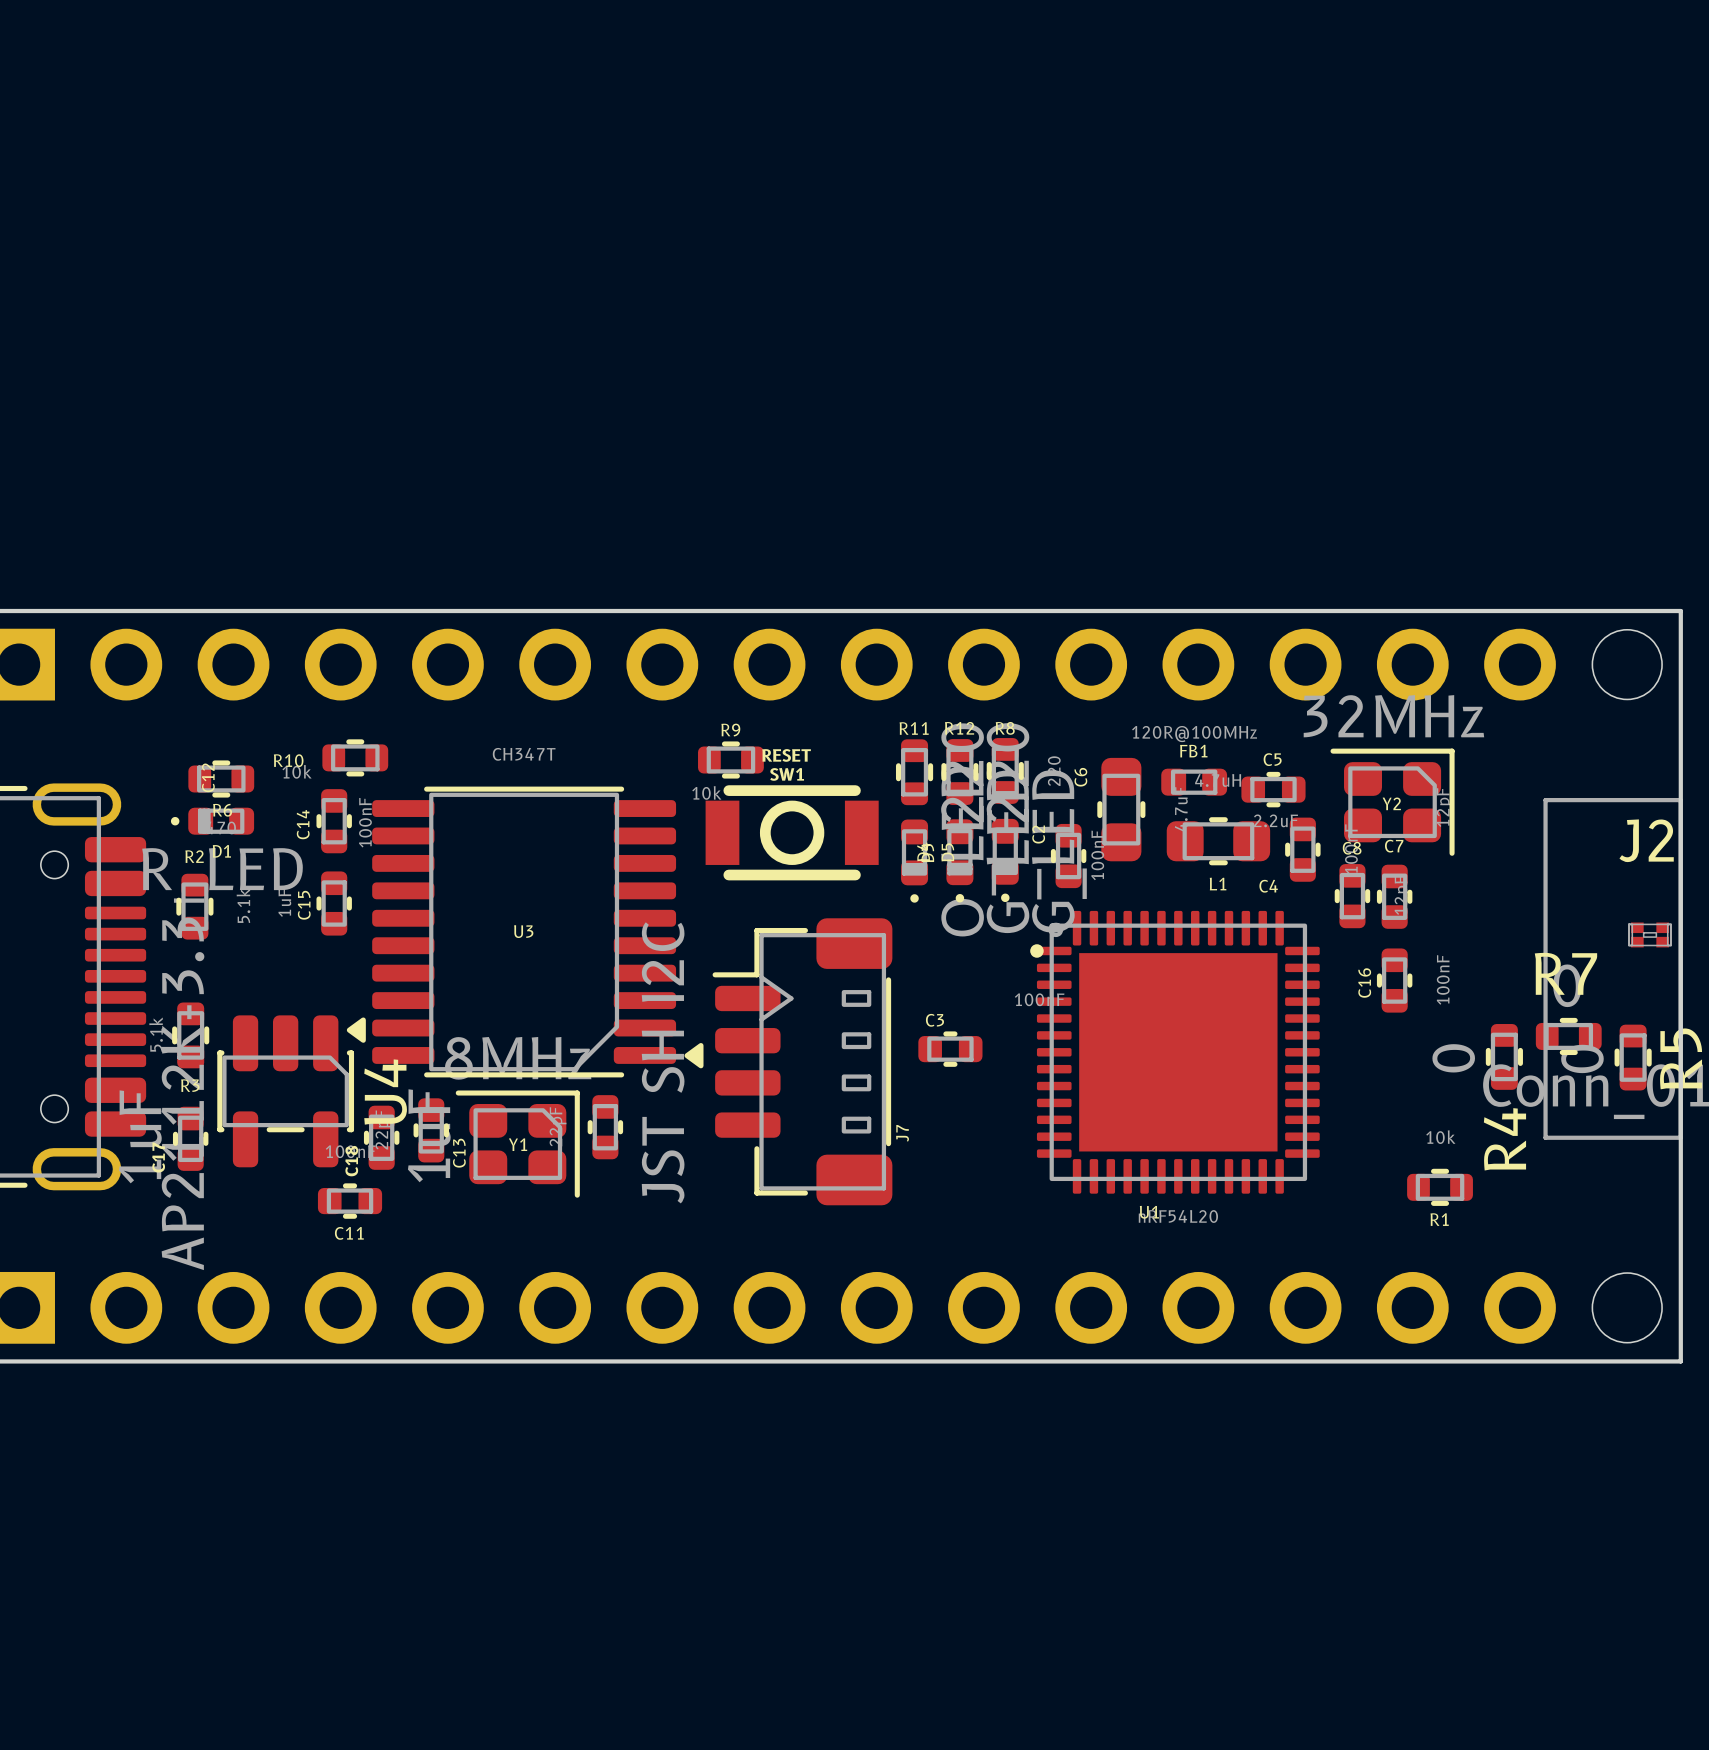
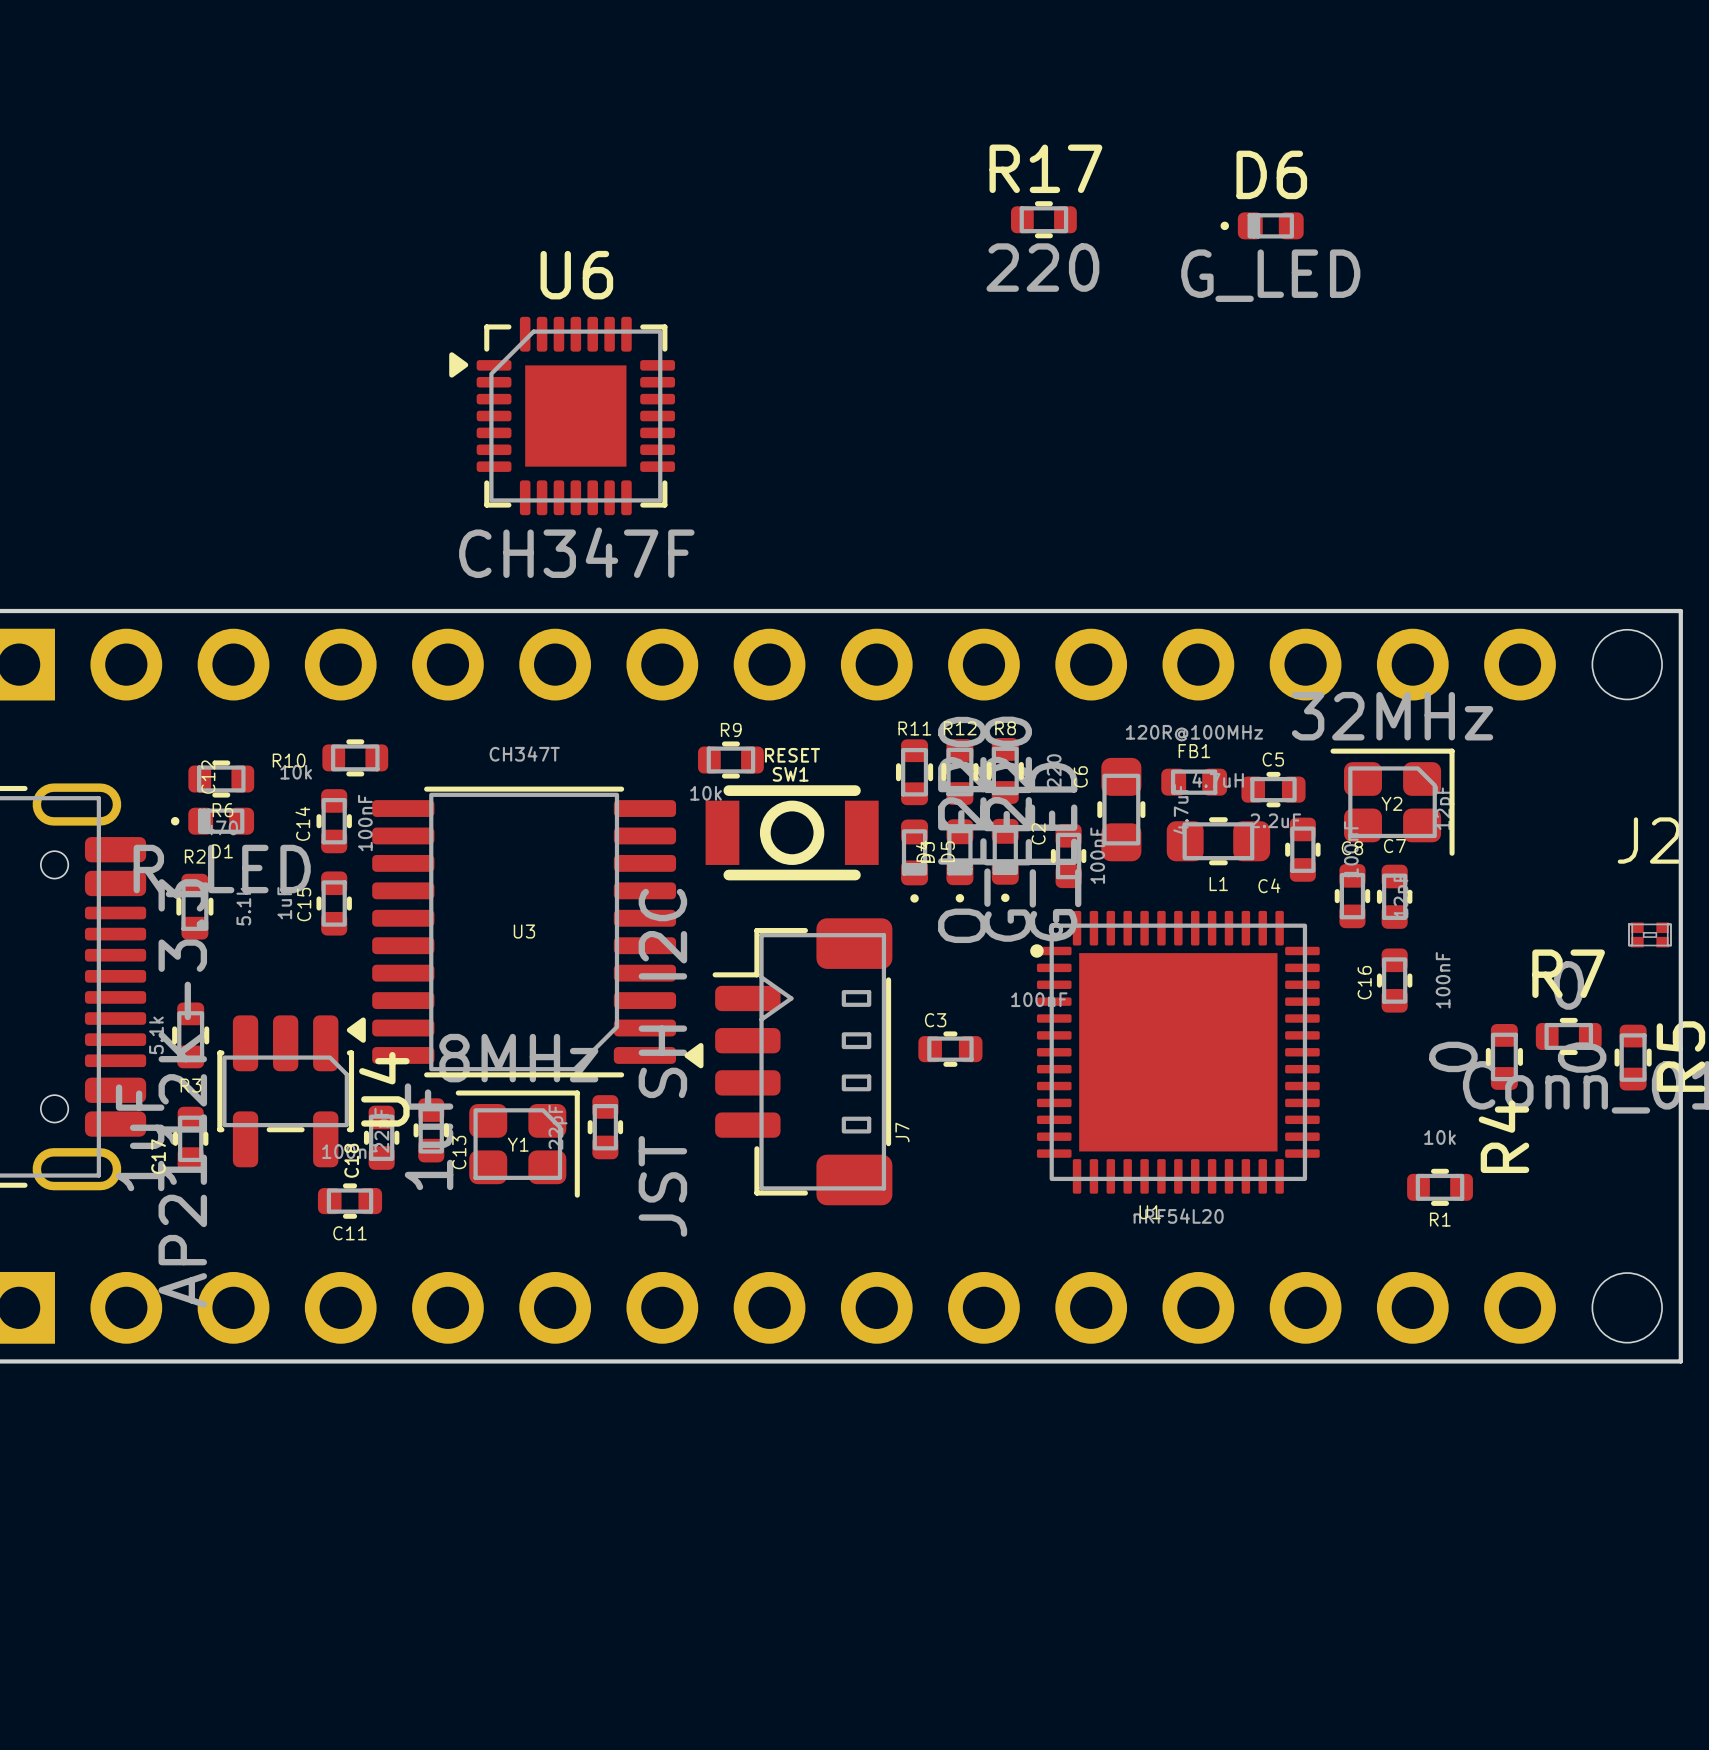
R17: none -> 220 (1043, 219)
D6: none -> G_LED (1262, 225)
U6: none -> CH347F (562, 416)
line: (1545, 800) (1680, 800) (1680, 1137) (1545, 1137) (1545, 800) -> none

